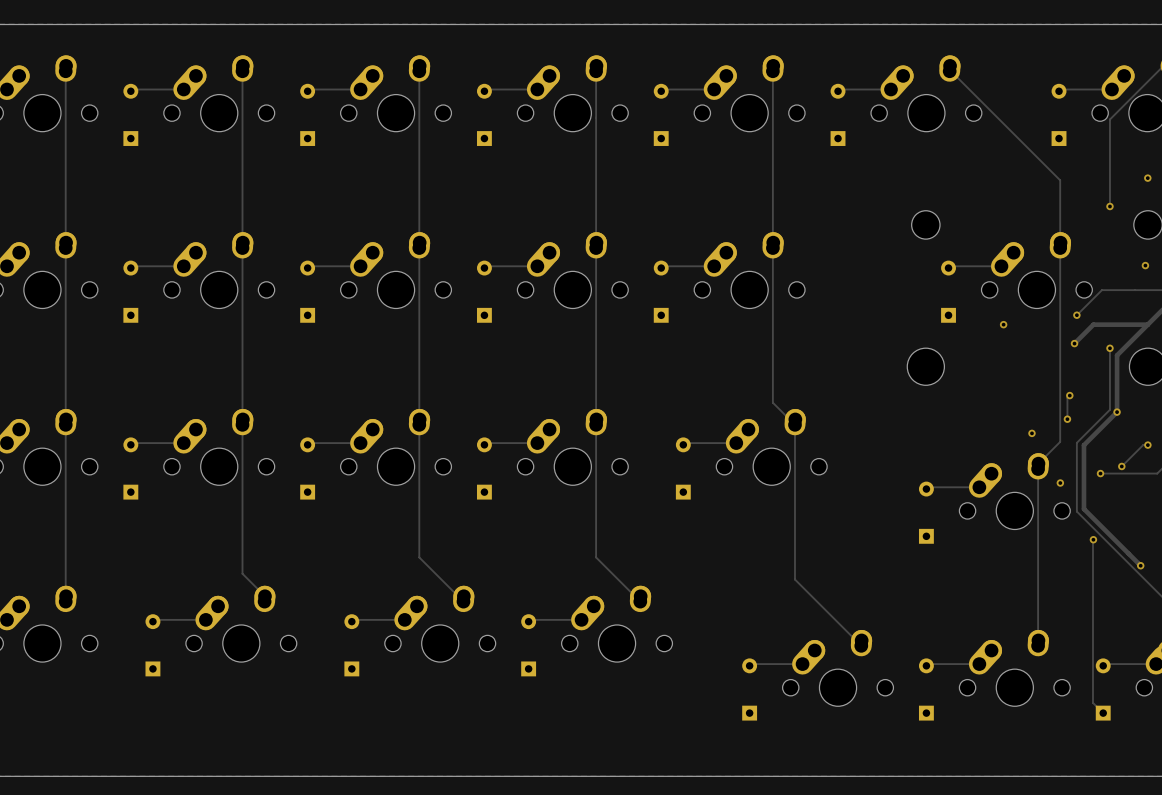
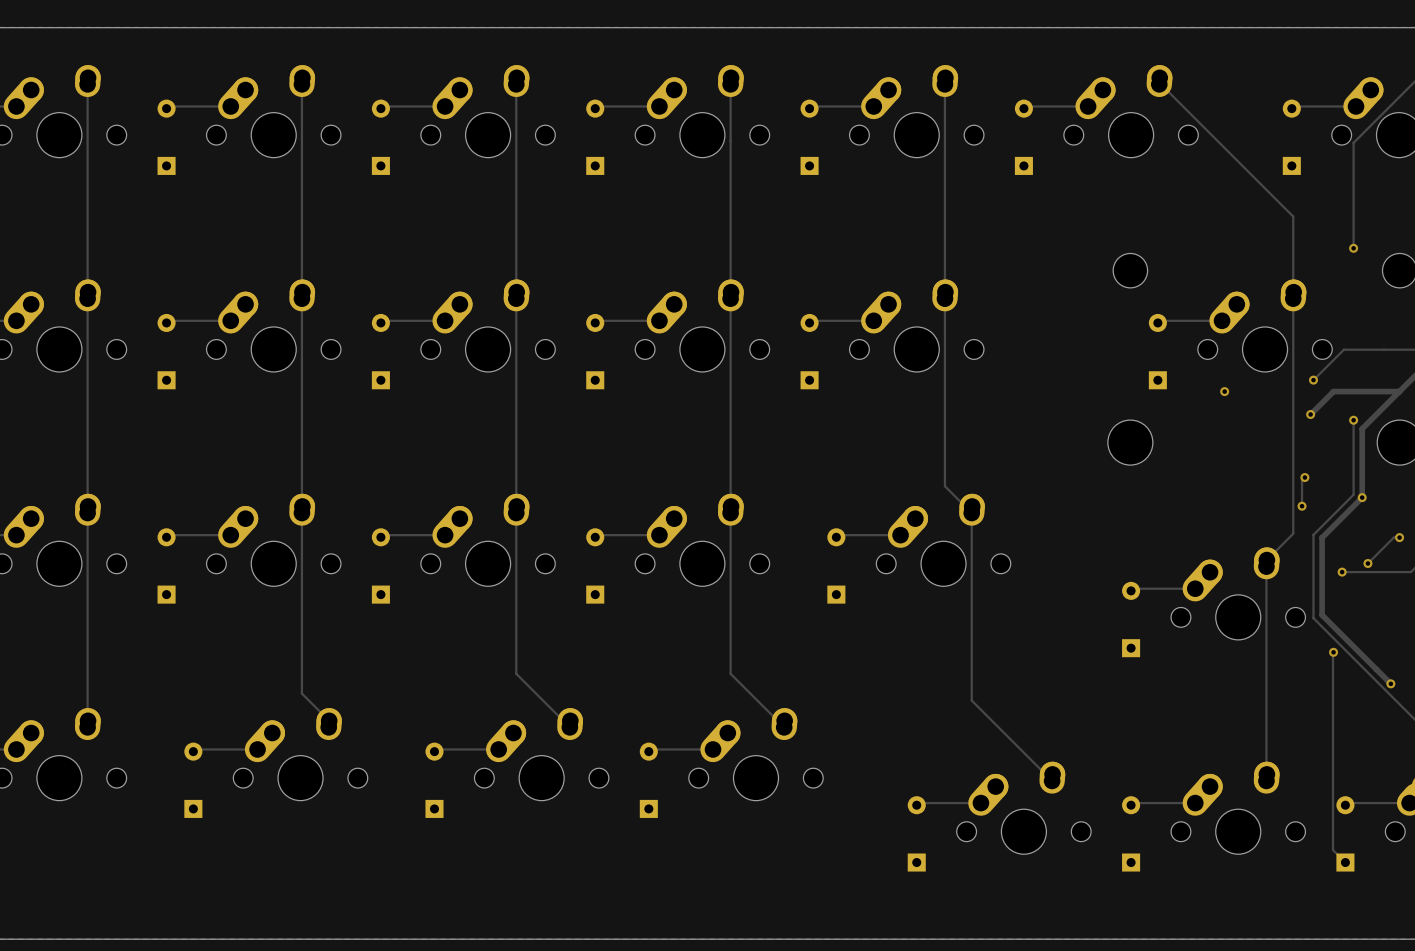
via: (1147, 178) -> none
via: (1145, 265) -> none
via: (1031, 433) -> none
via: (1060, 483) -> none

